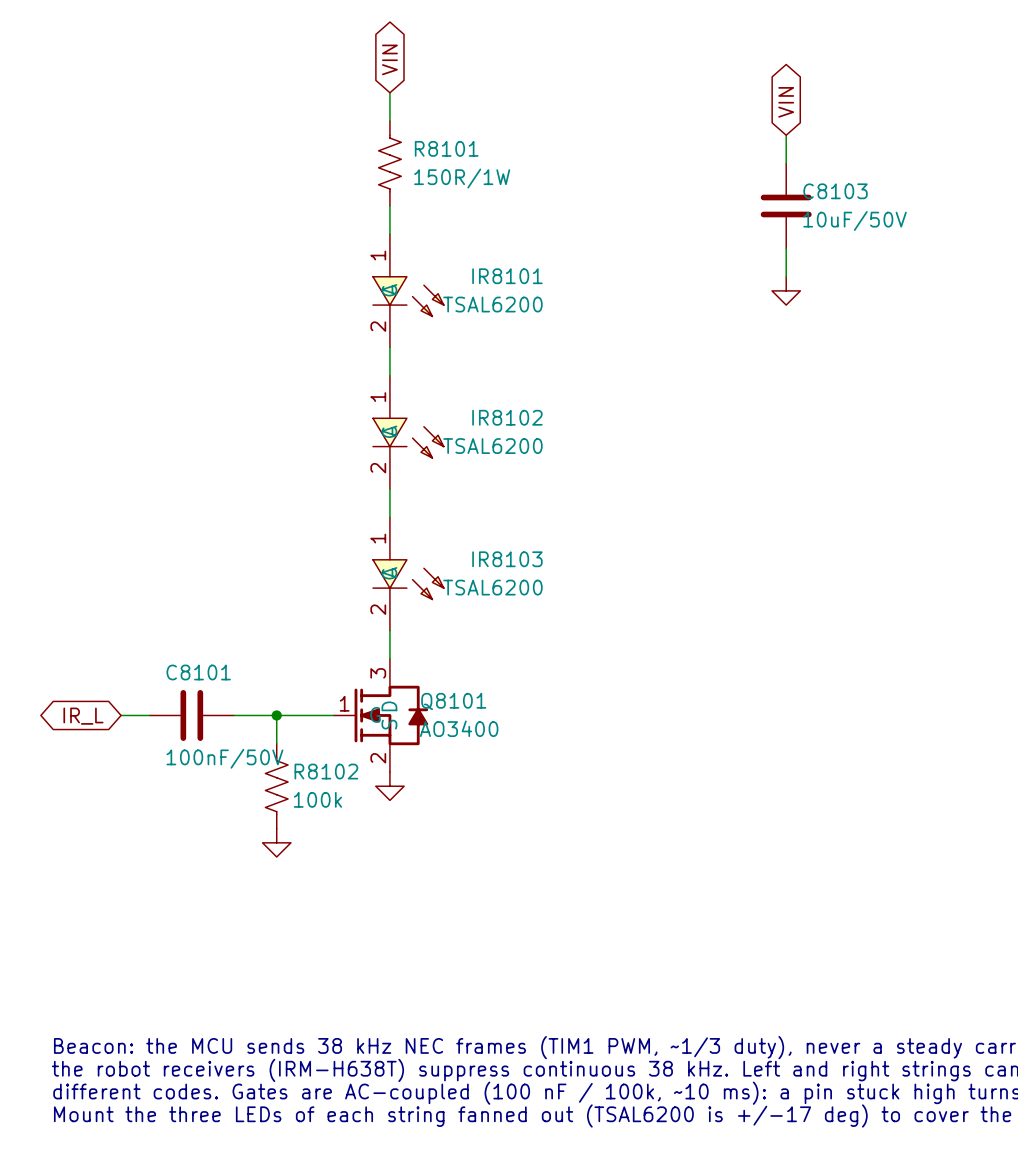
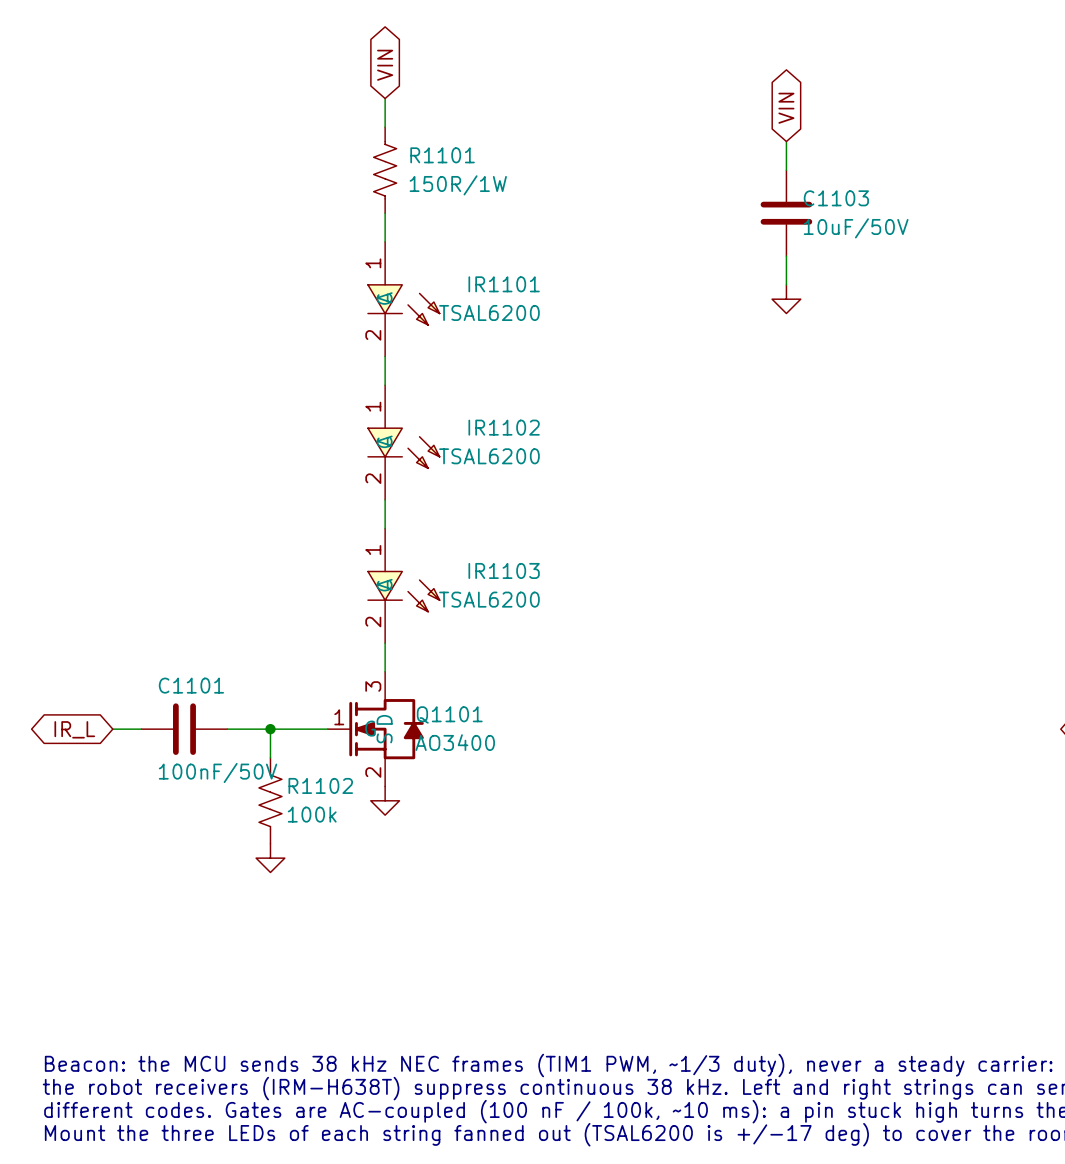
R8101 name: R8101 (446, 148) -> R1101 (442, 155)
C8103 name: C8103 (835, 191) -> C1103 (836, 198)
IR8101 name: IR8101 (507, 276) -> IR1101 (504, 284)
IR8102 name: IR8102 (507, 417) -> IR1102 (504, 427)
IR8103 name: IR8103 (507, 559) -> IR1103 (504, 570)
C8101 name: C8101 (198, 672) -> C1101 (191, 685)
Q8101 name: Q8101 (453, 701) -> Q1101 (449, 714)
R8102 name: R8102 (326, 771) -> R1102 (320, 785)

